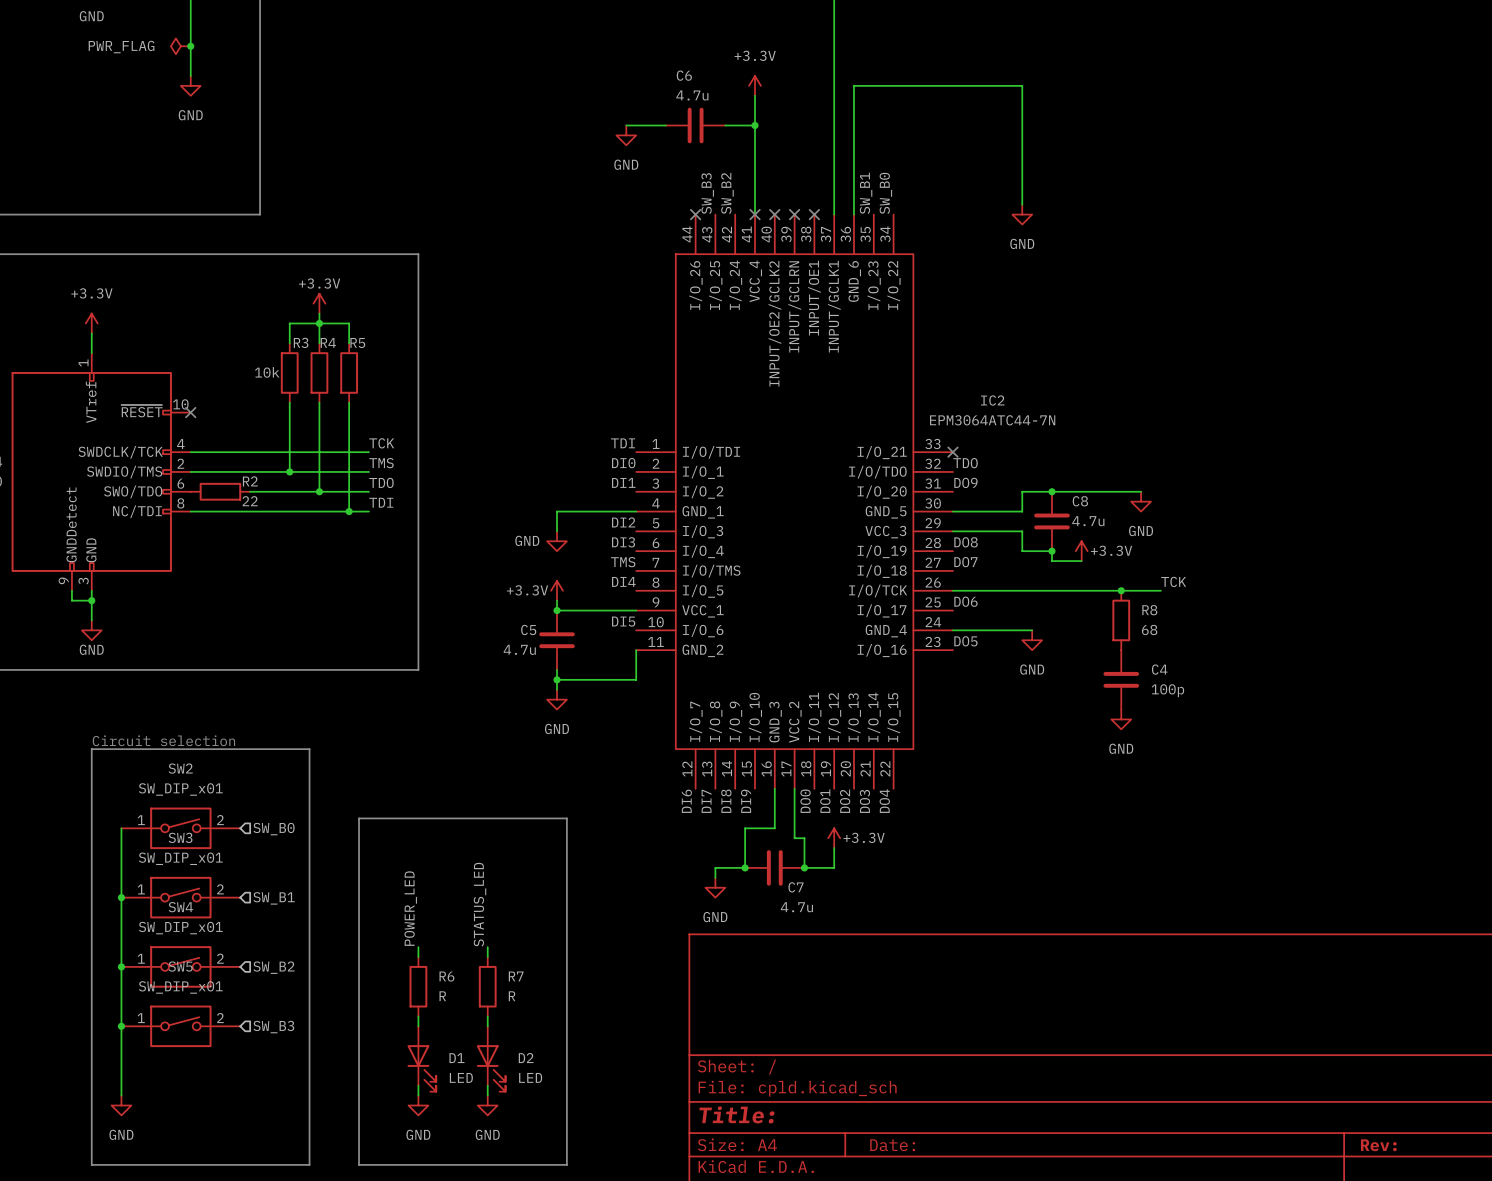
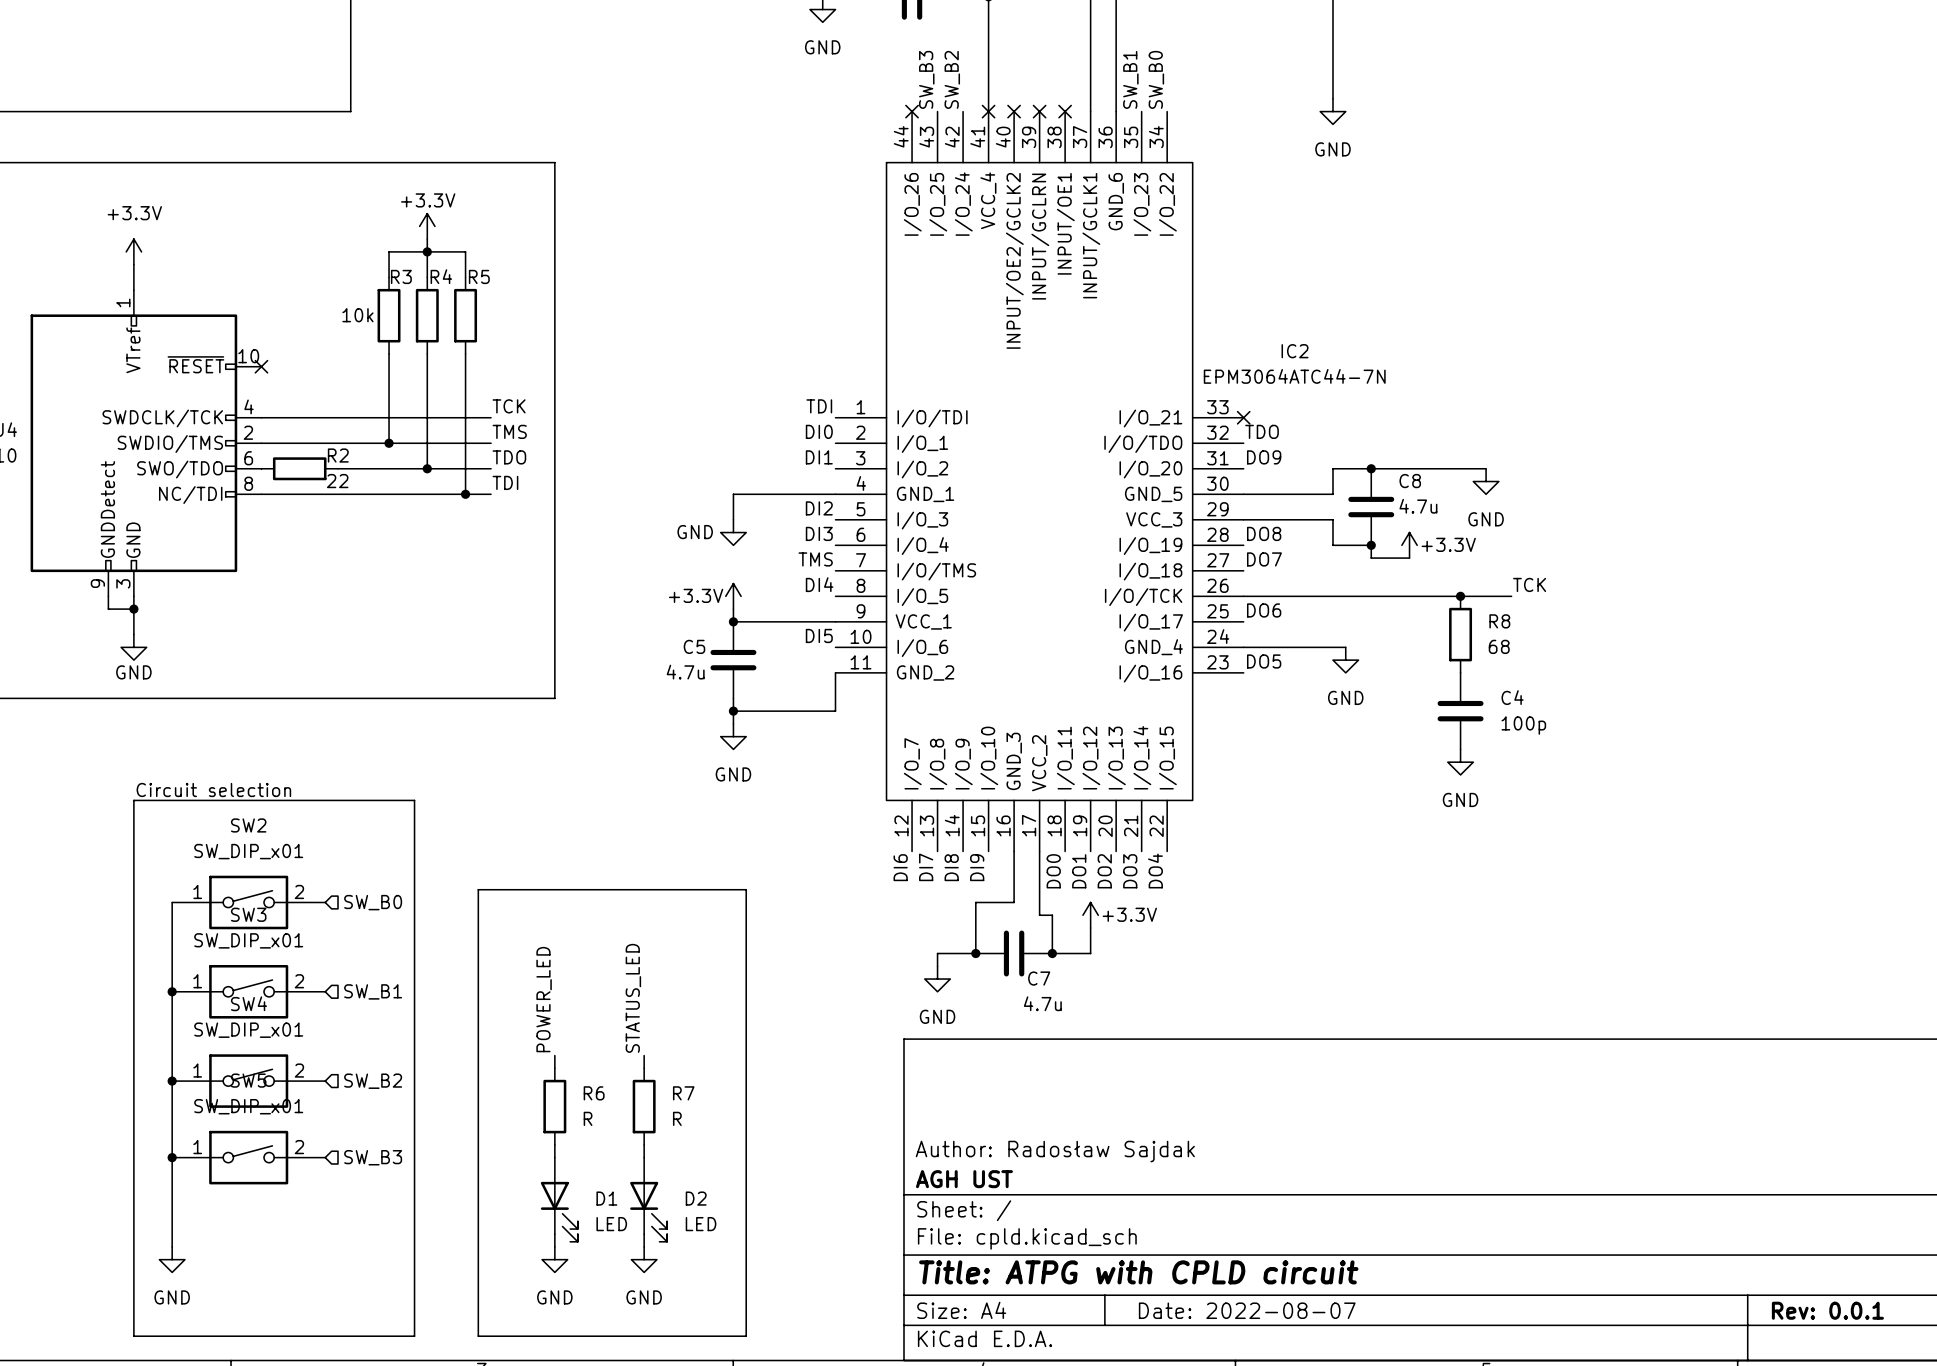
title block: none -> Author: Radosław Sajdak (1055, 1151)
title block: none -> AGH UST (964, 1179)
title block: Title: (736, 1114) -> Title: ATPG with CPLD circuit (1138, 1272)
title block: Date: (892, 1145) -> Date: 2022-08-07 (1247, 1310)
title block: Rev: (1378, 1145) -> Rev: 0.0.1 (1827, 1310)

